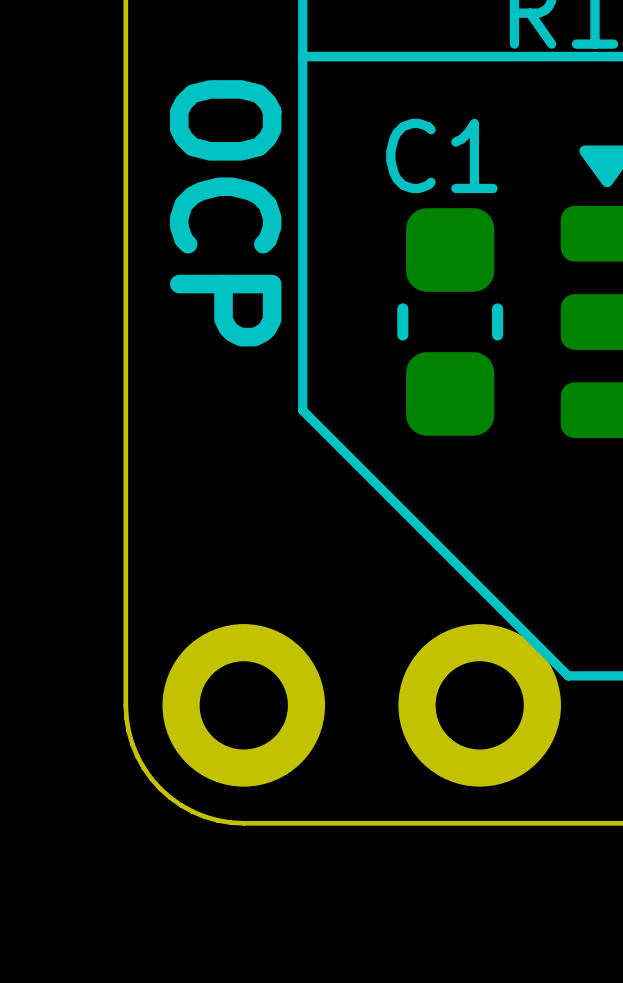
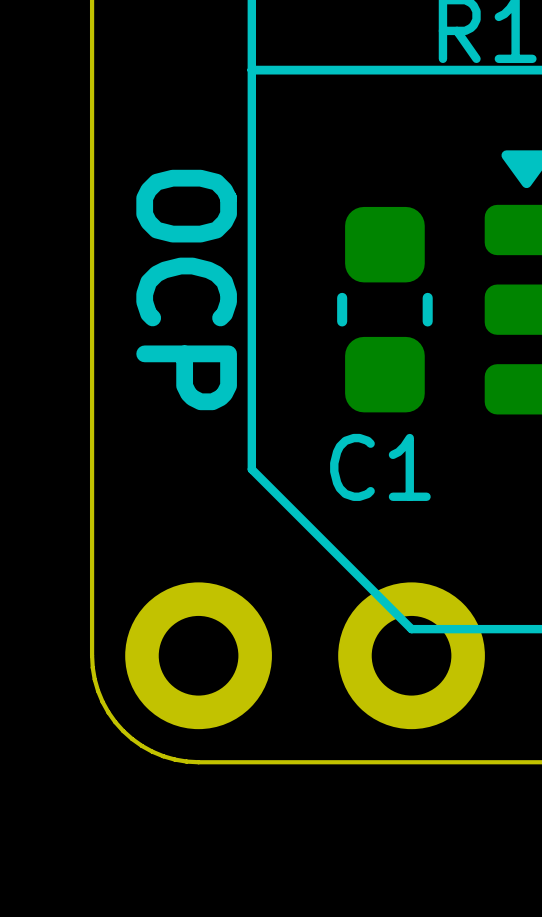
C1 name position: C1 (441, 155) -> C1 (380, 467)
text position: OCP (225, 213) -> OCP (186, 289)
line: (302, 410) (568, 675) -> (251, 389) (251, 469) (411, 629) (491, 629)

